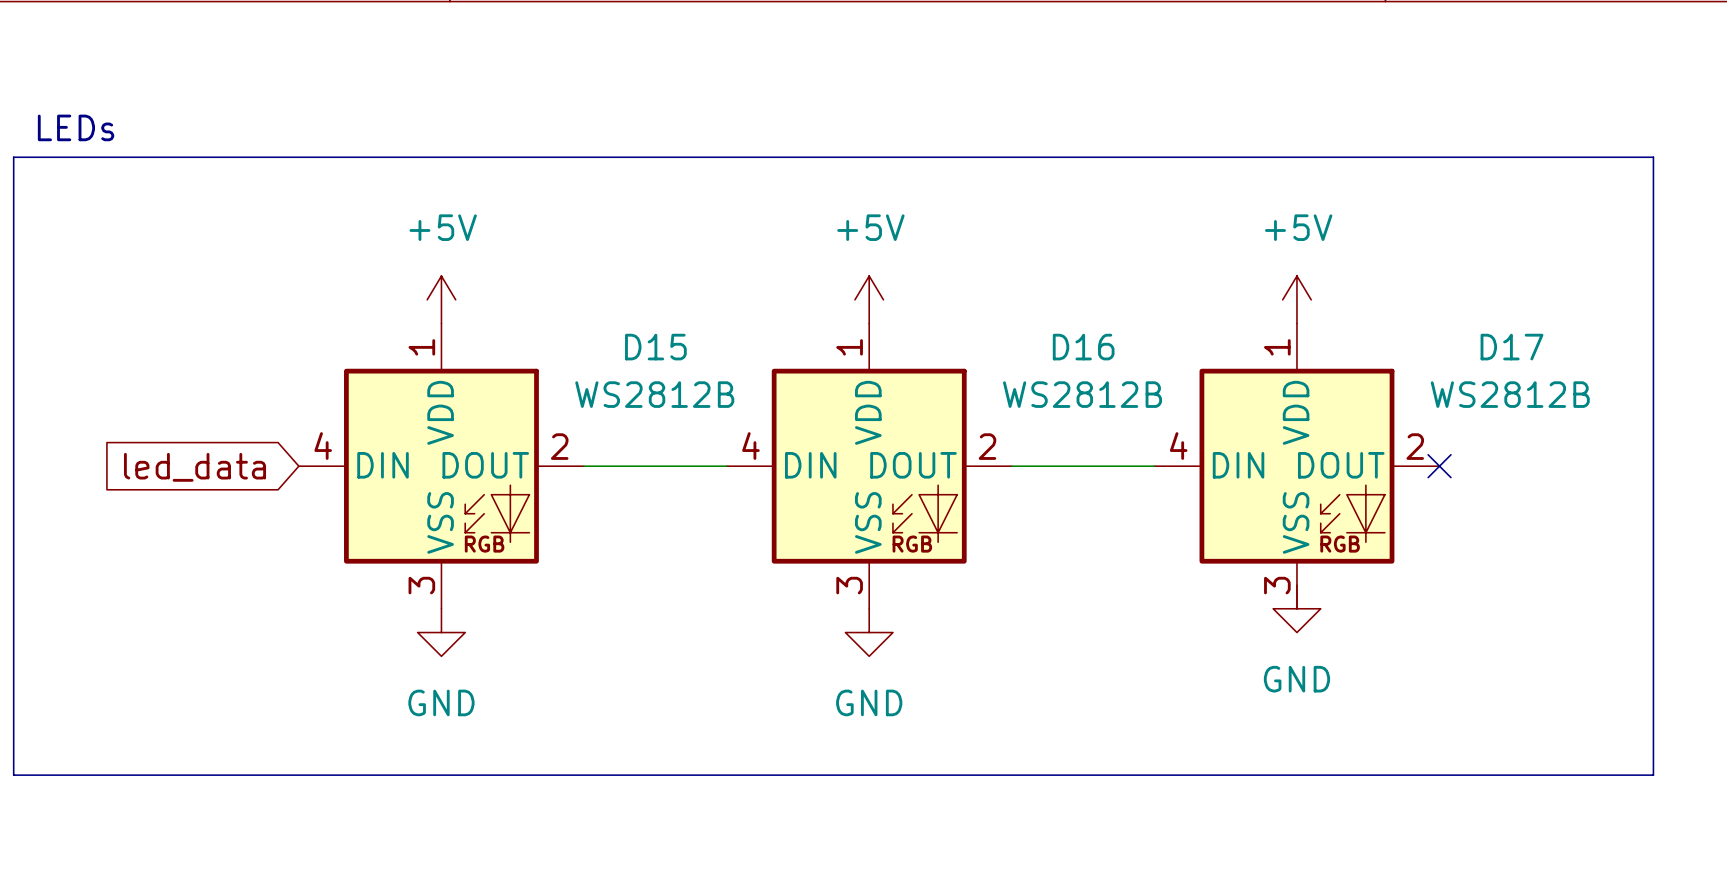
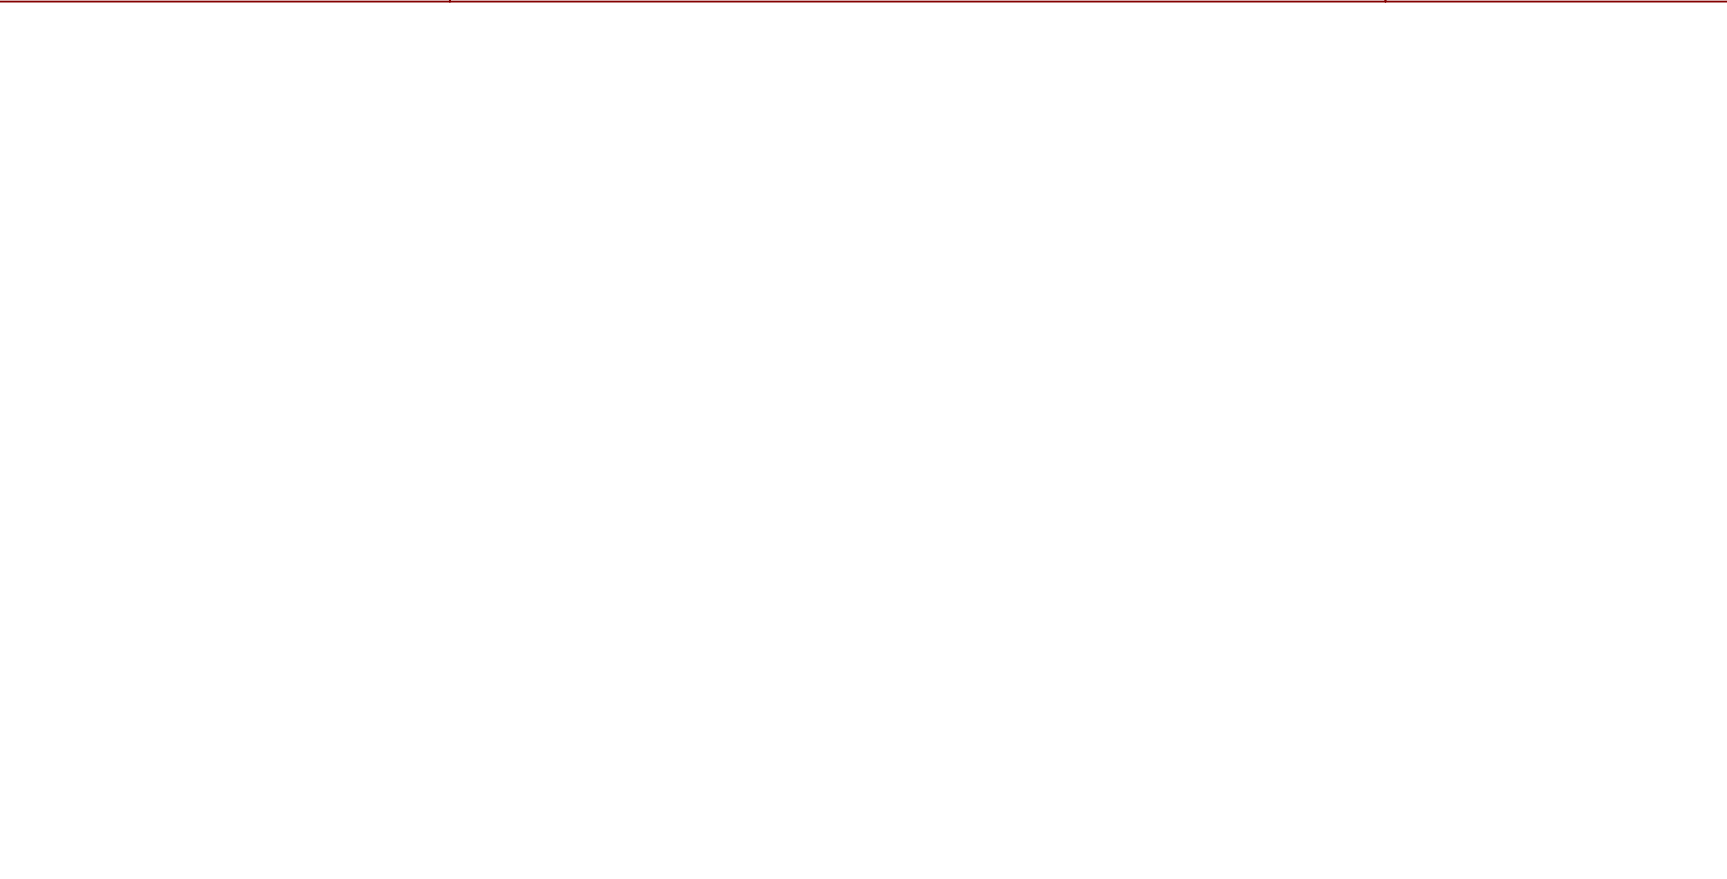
text: LEDs (76, 127) -> none
line: (13, 157) (1653, 157) (1653, 775) (13, 775) (13, 157) -> none
power symbol: +5V (441, 299) -> none
power symbol: +5V (869, 299) -> none
power symbol: +5V (1296, 299) -> none
D15: WS2812B (441, 466) -> none
wire: (584, 466) (726, 466) -> none
D16: WS2812B (869, 466) -> none
wire: (1011, 466) (1154, 466) -> none
D17: WS2812B (1296, 466) -> none
no-connect mark: (1439, 466) -> none
global label: led_data (195, 467) -> none
power symbol: GND (1296, 608) -> none
power symbol: GND (441, 632) -> none
power symbol: GND (869, 632) -> none

